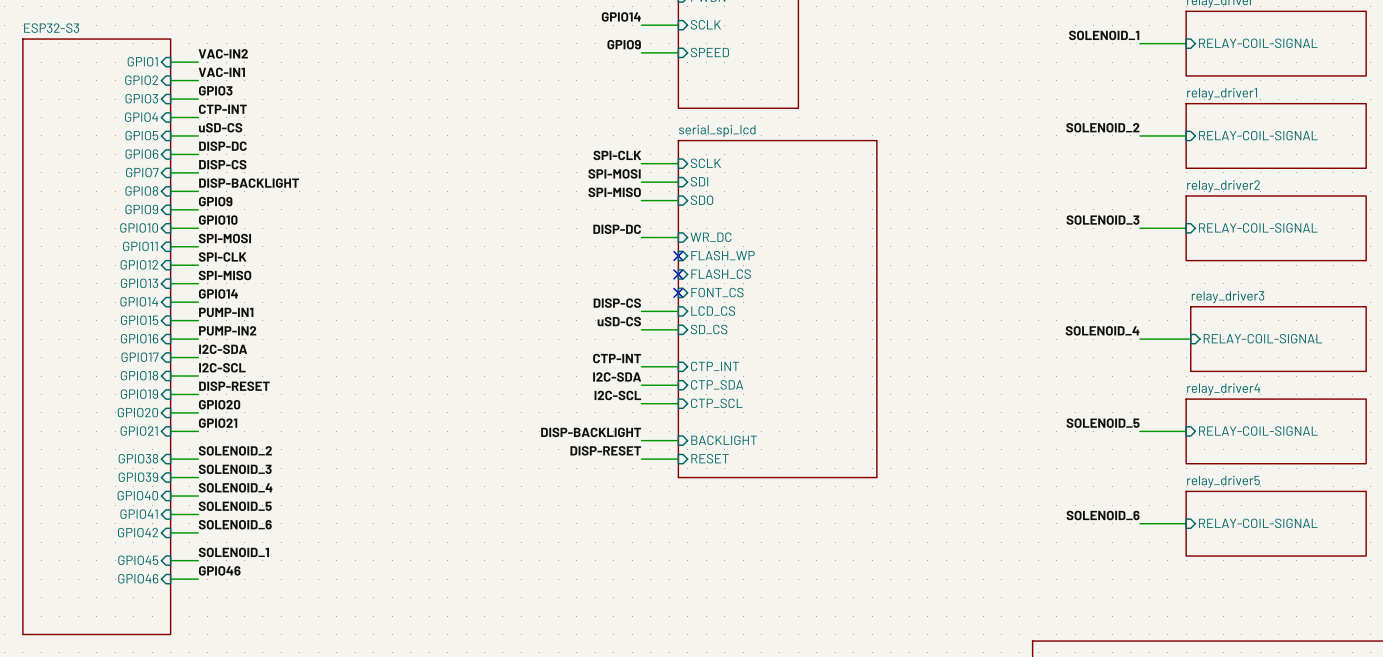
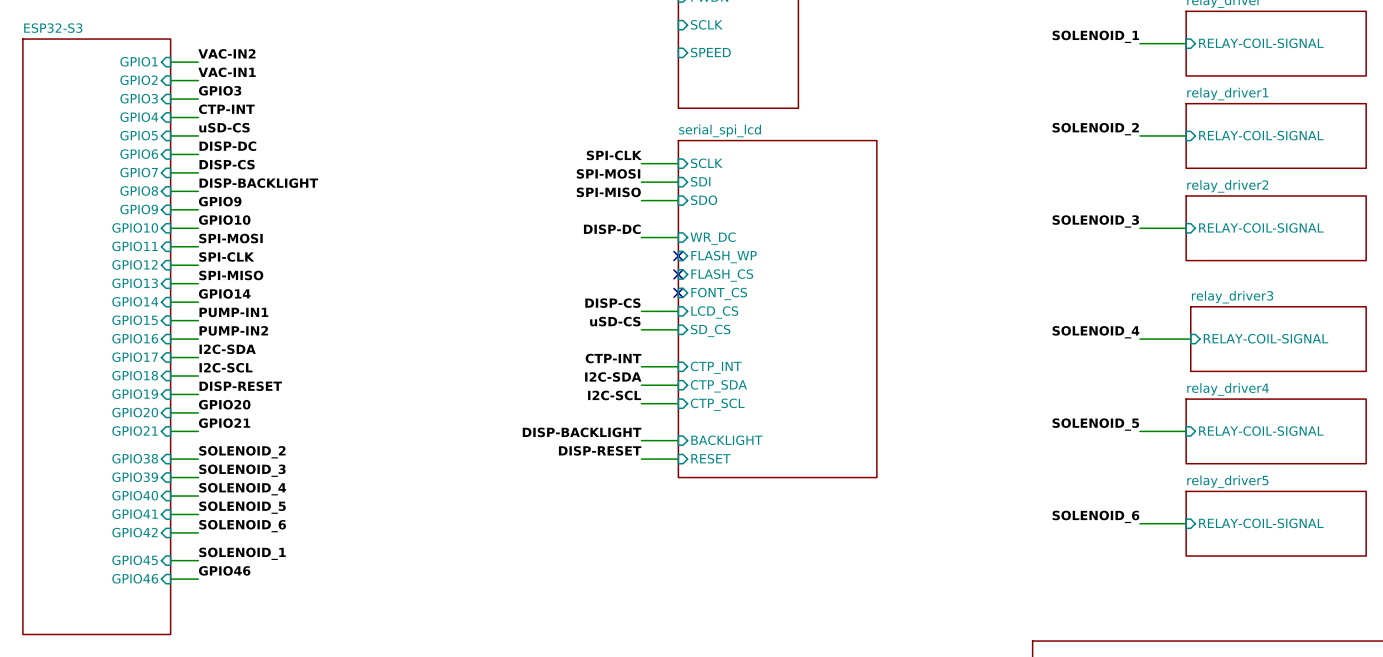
label: GPIO14 (621, 16) -> none
wire: (641, 25) (678, 25) -> none
label: GPIO9 (624, 44) -> none
wire: (641, 52) (678, 52) -> none

